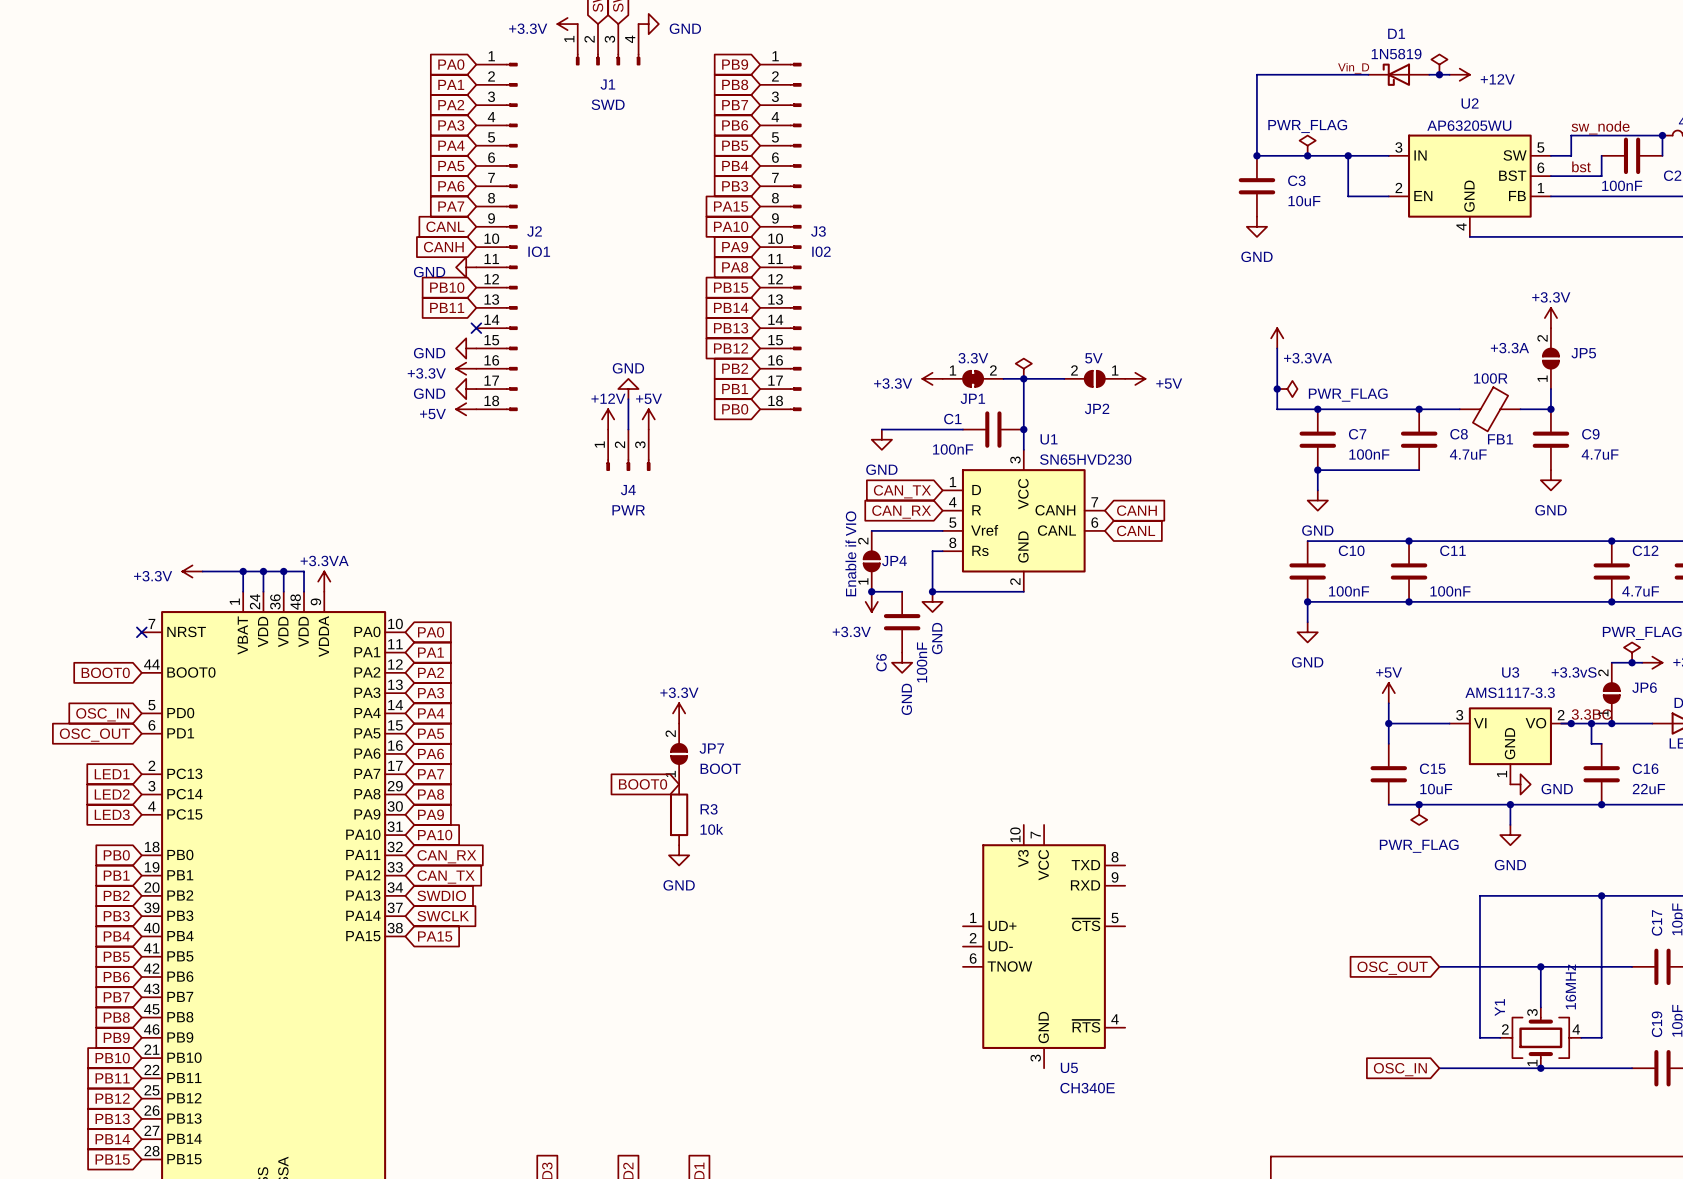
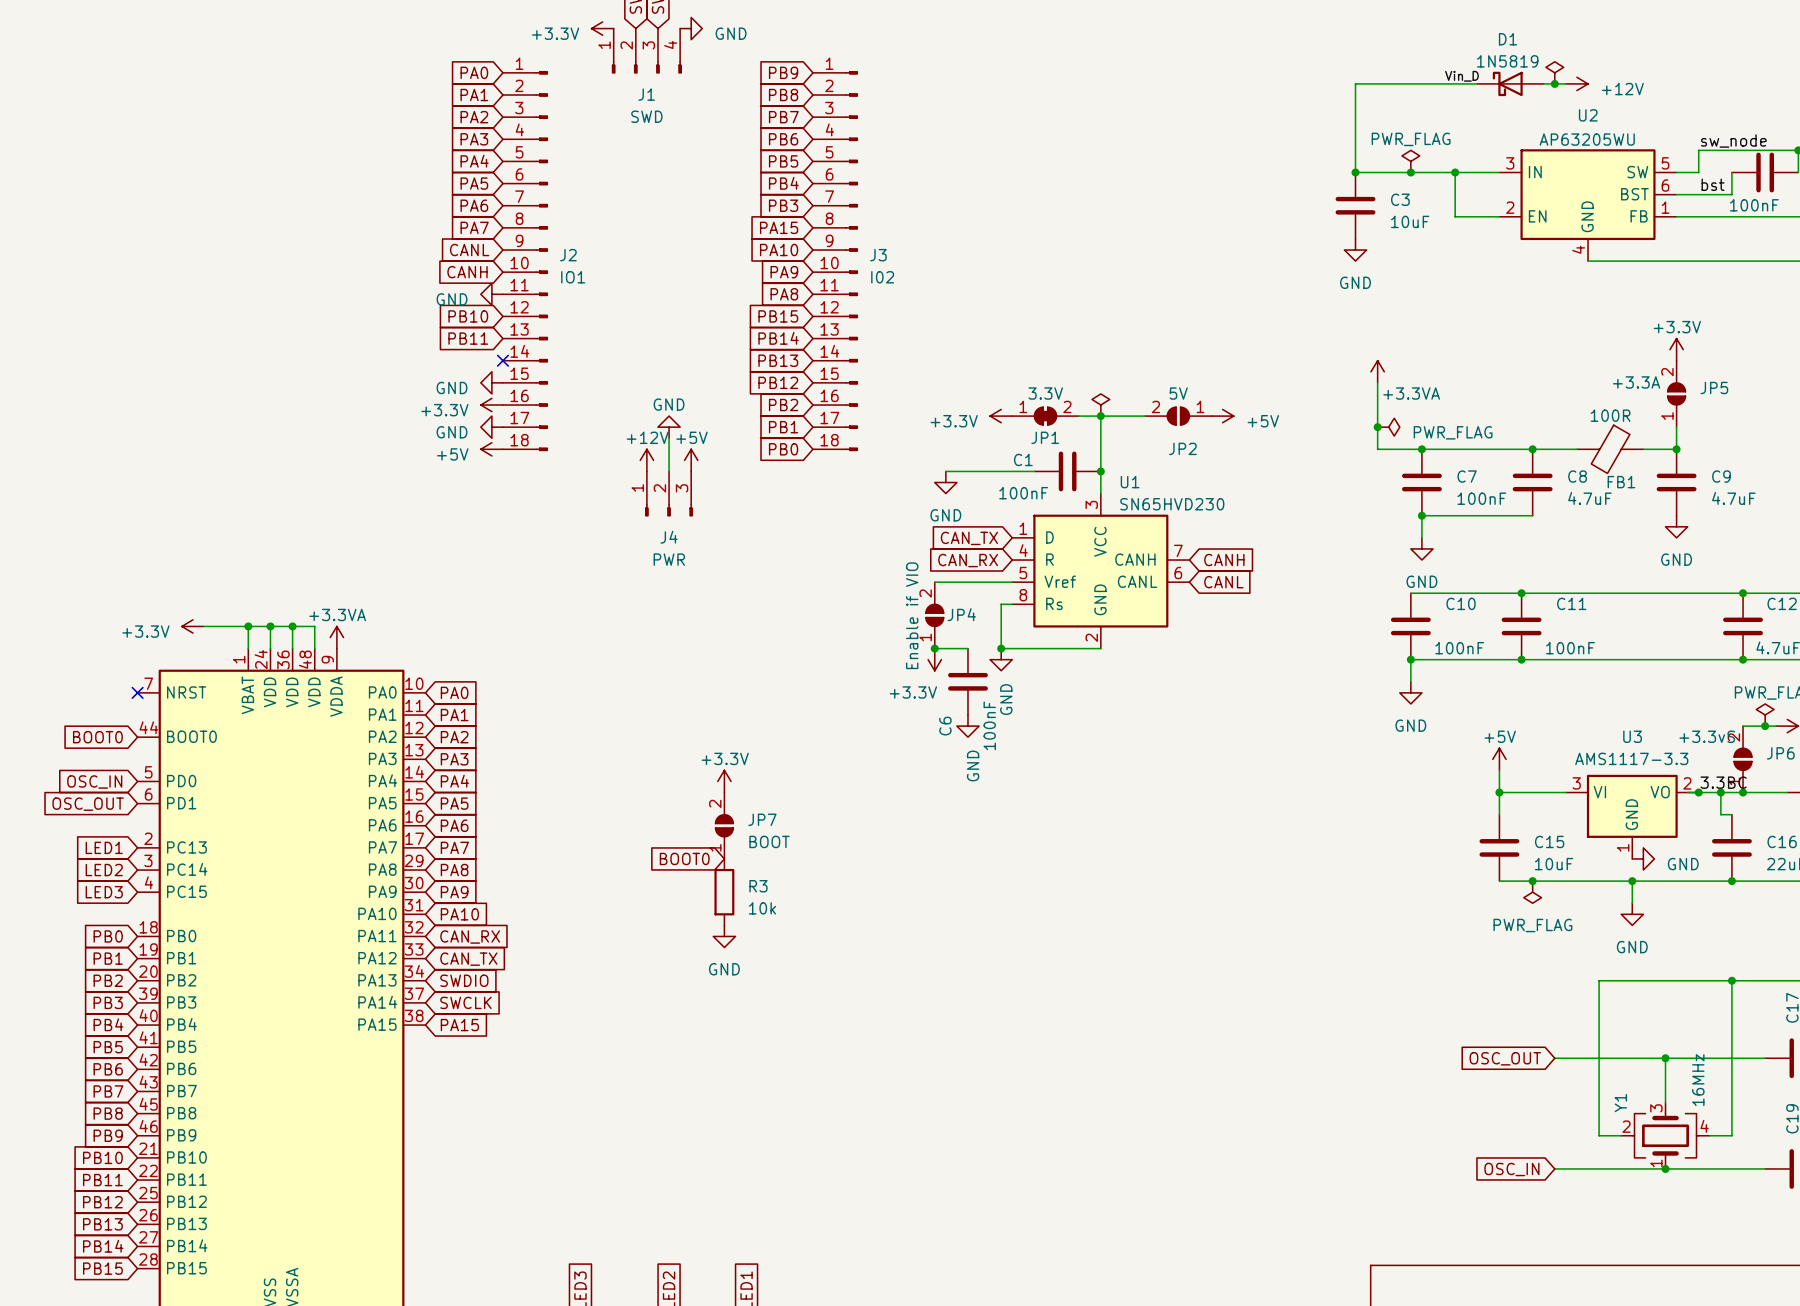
U5: CH340E (1044, 946) -> none

